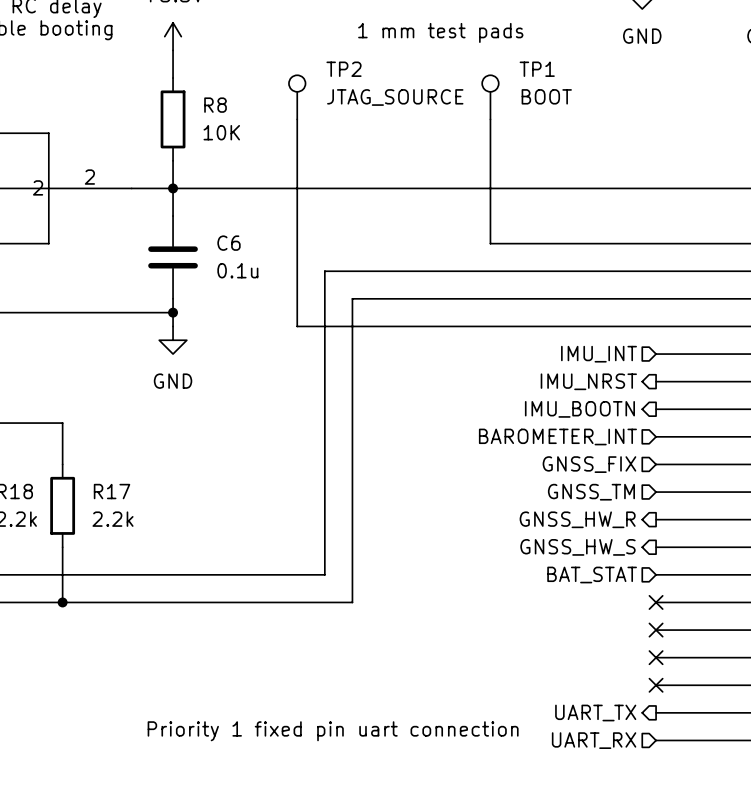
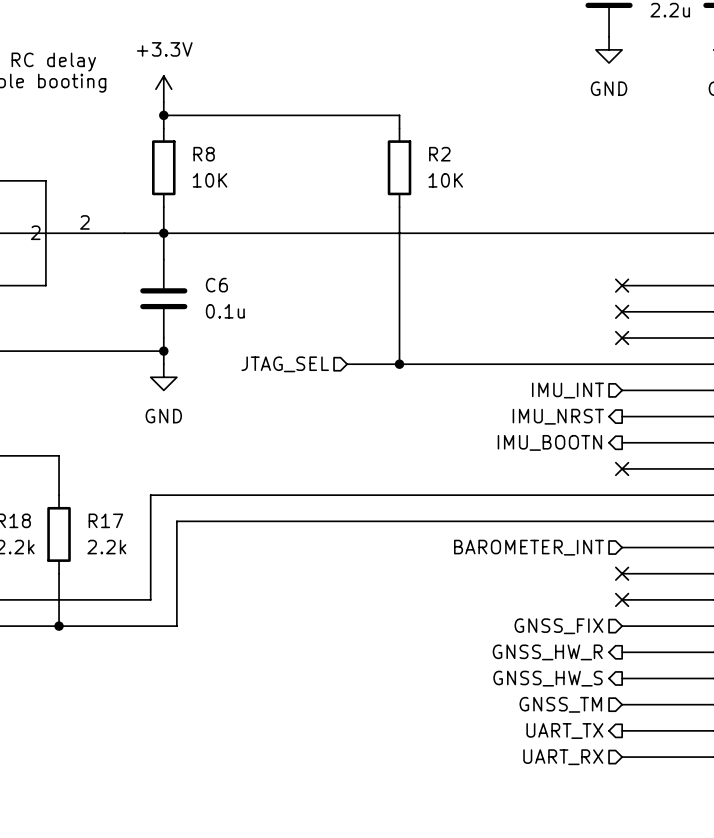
text: 1 mm test pads (440, 32) -> none
wire: none -> (163, 115) (399, 115) (399, 128)
junction: none -> (163, 115)
TP2: JTAG_SOURCE (297, 97) -> none
TP1: BOOT (490, 97) -> none
wire: (297, 119) (297, 326) (366, 326) -> none
R2: none -> 10K (399, 167)
wire: (490, 119) (490, 243) (656, 243) -> none
wire: none -> (399, 207) (399, 364)
no-connect mark: none -> (622, 285)
wire: (656, 271) (324, 271) (324, 574) (159, 574) -> (622, 495) (150, 495) (150, 599)
no-connect mark: none -> (622, 311)
wire: (656, 298) (352, 298) (352, 602) (186, 602) -> (622, 521) (176, 521) (176, 626)
no-connect mark: none -> (622, 338)
hierarchical label: none -> JTAG_SEL (285, 364)
junction: none -> (399, 364)
hierarchical label: BAROMETER_INT (557, 436) -> none
no-connect mark: none -> (622, 468)
hierarchical label position: GNSS_FIX (589, 464) -> GNSS_FIX (558, 626)
hierarchical label position: GNSS_TM (591, 492) -> GNSS_TM (560, 704)
hierarchical label shape: output (577, 519) -> input (529, 547)
hierarchical label: GNSS_HW_R (577, 519) -> BAROMETER_INT (529, 547)
hierarchical label position: GNSS_HW_S (577, 547) -> GNSS_HW_S (548, 678)
no-connect mark: none -> (622, 573)
no-connect mark: none -> (622, 599)
hierarchical label: BAT_STAT (592, 575) -> none
no-connect mark: (656, 602) -> none
hierarchical label: none -> GNSS_HW_R (547, 652)
no-connect mark: (656, 630) -> none
no-connect mark: (656, 657) -> none
no-connect mark: (656, 685) -> none
text: Priority 1 fixed pin uart connection (333, 731) -> none

